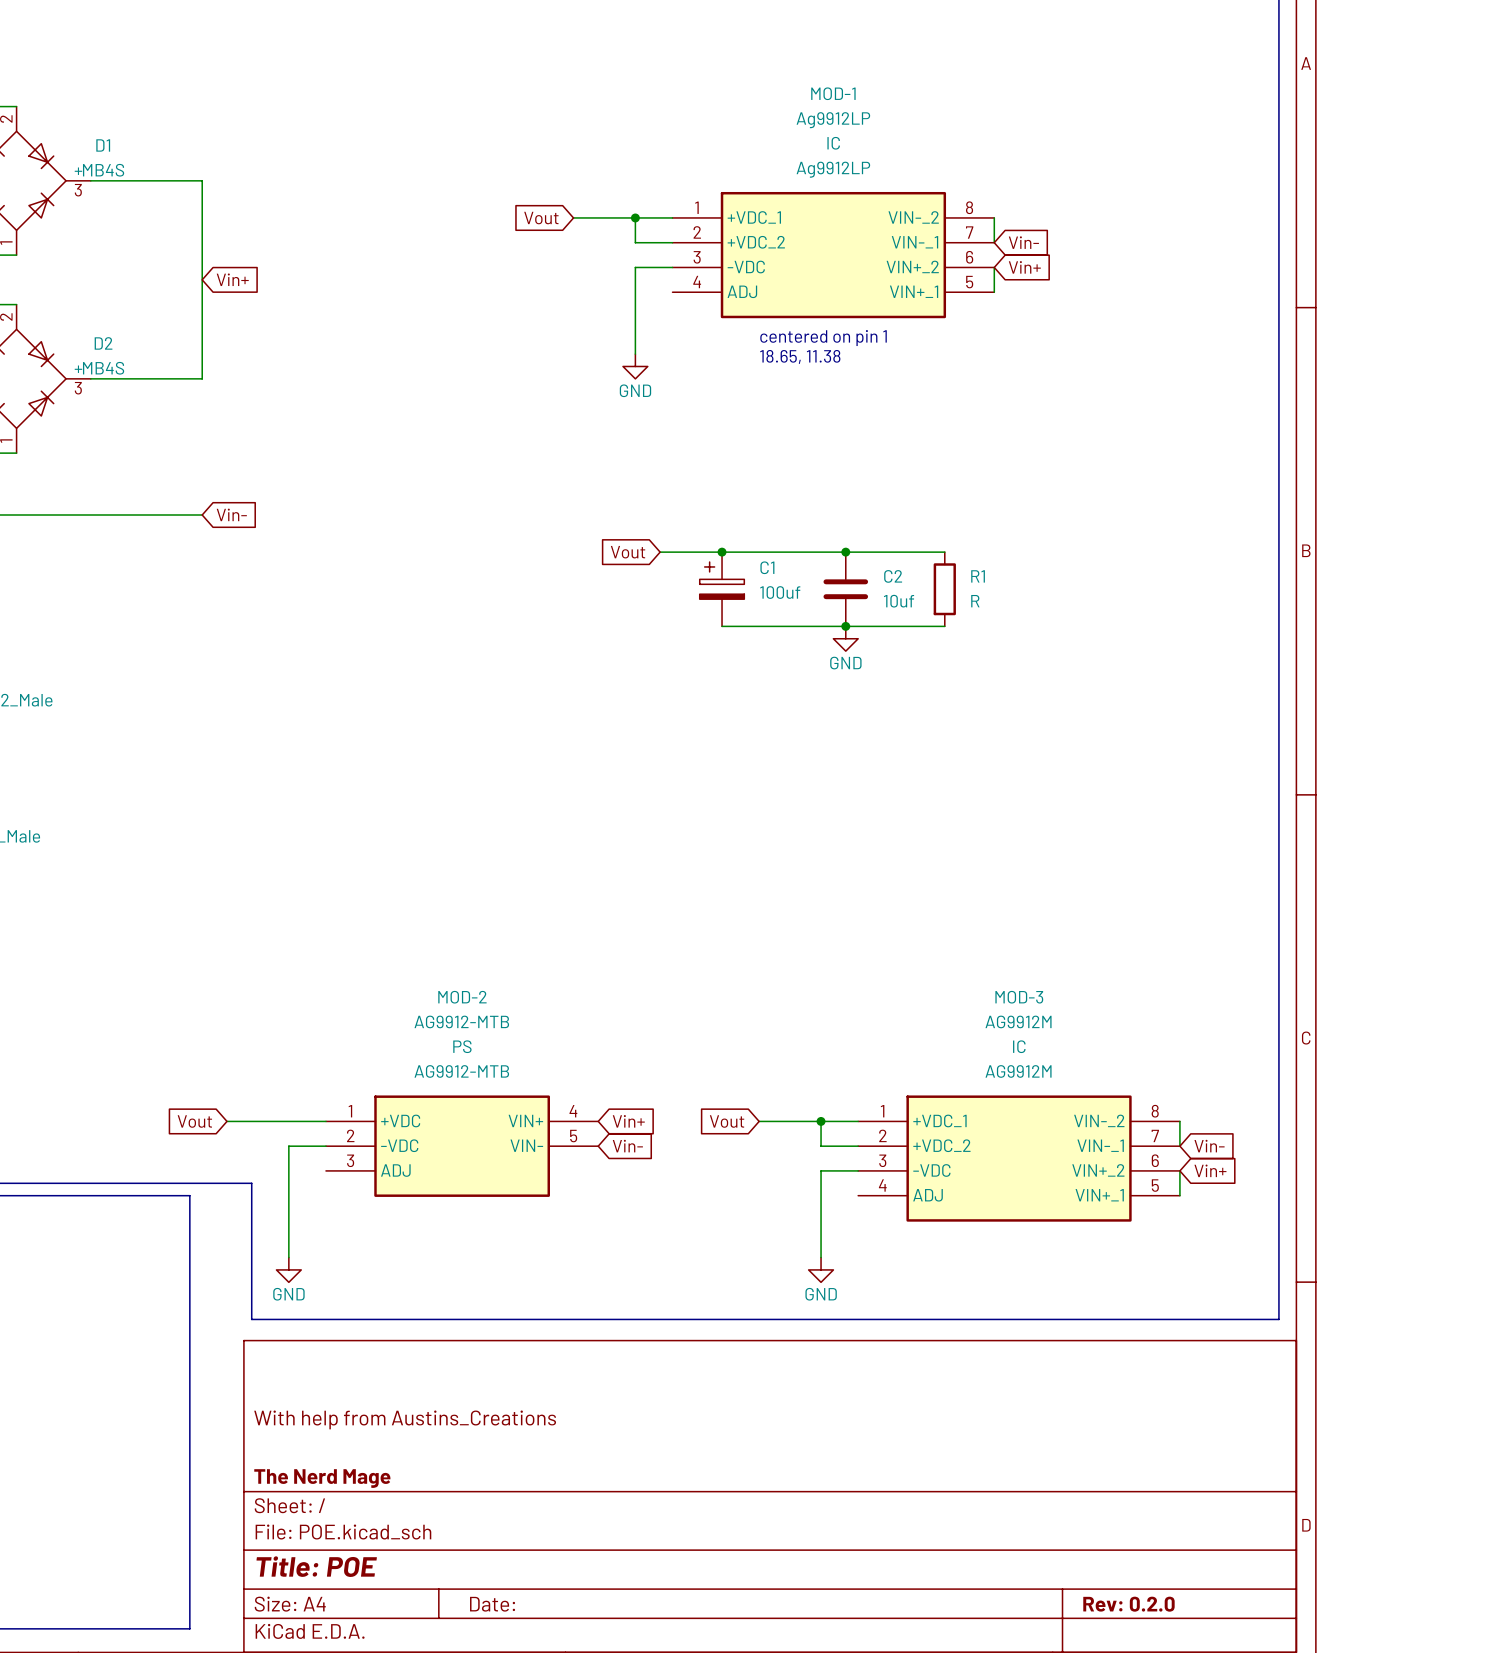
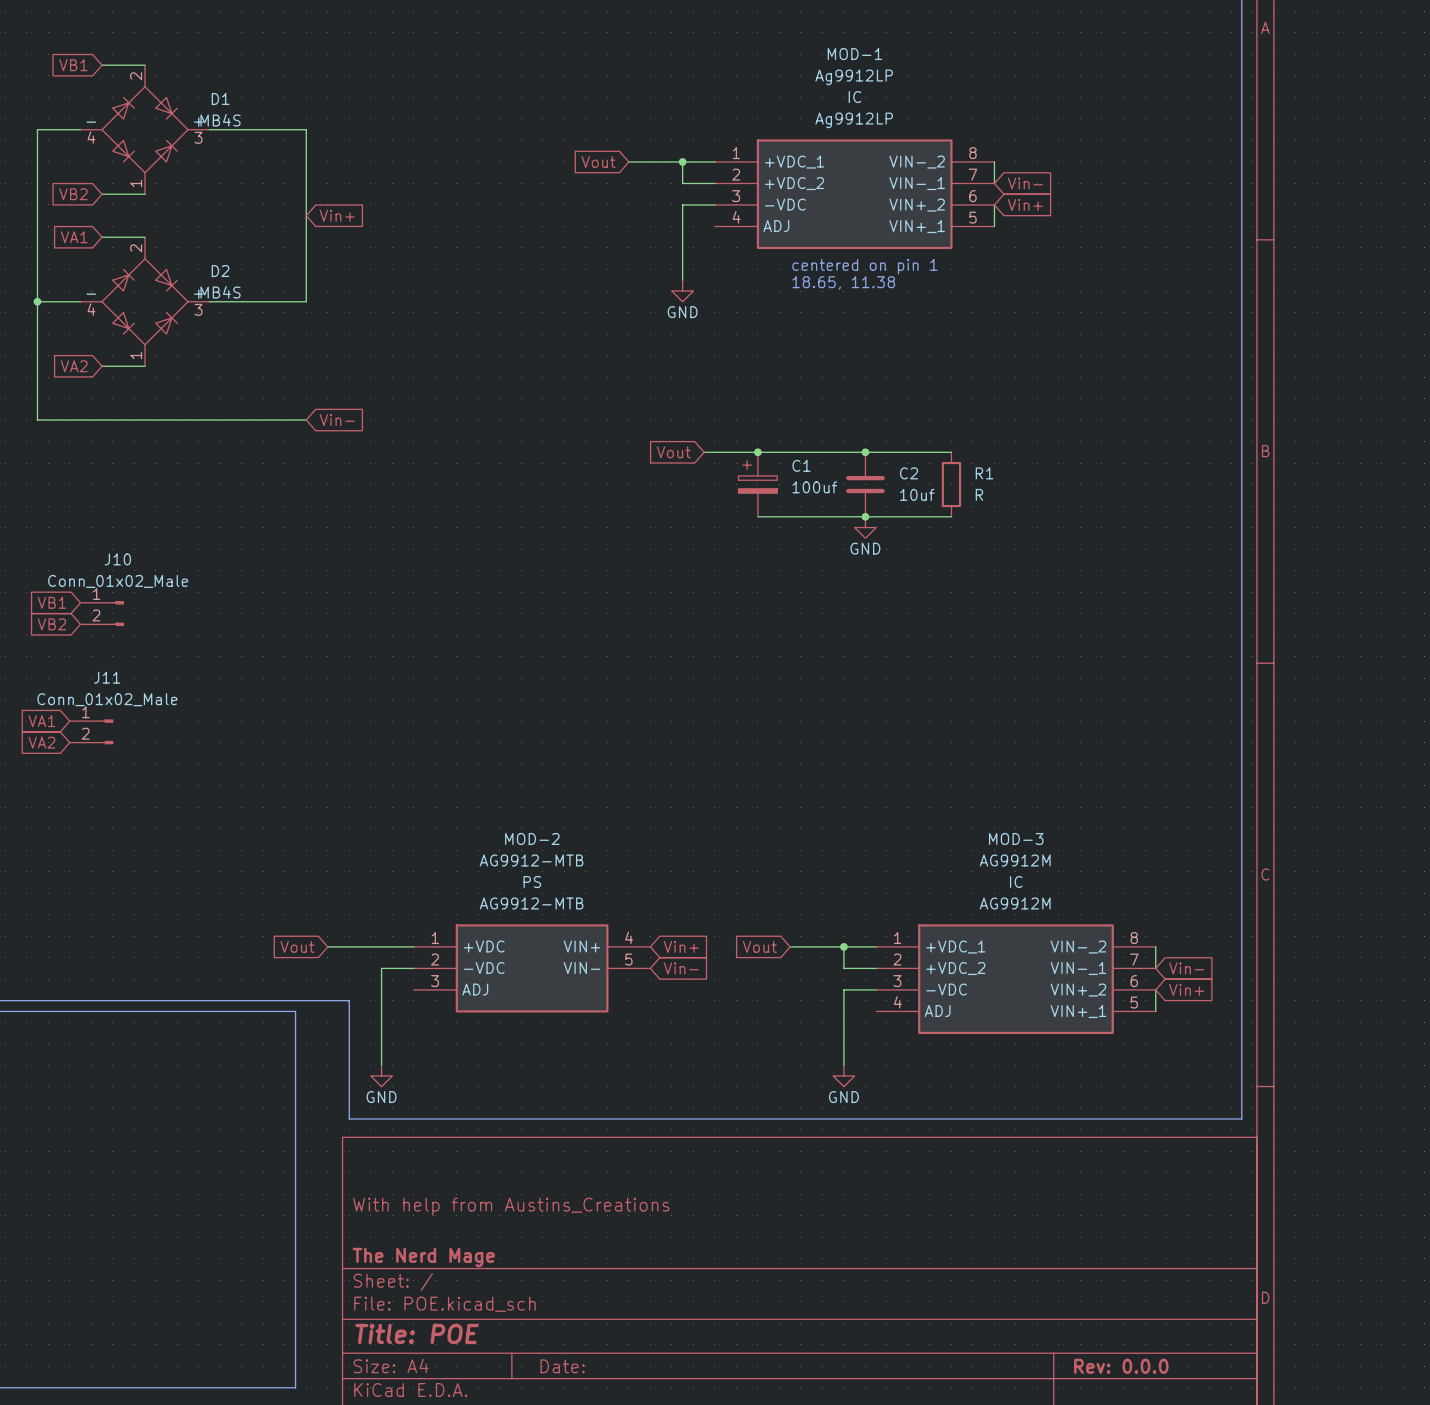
title block: Rev: 0.2.0 (1128, 1604) -> Rev: 0.0.0 (1121, 1366)

